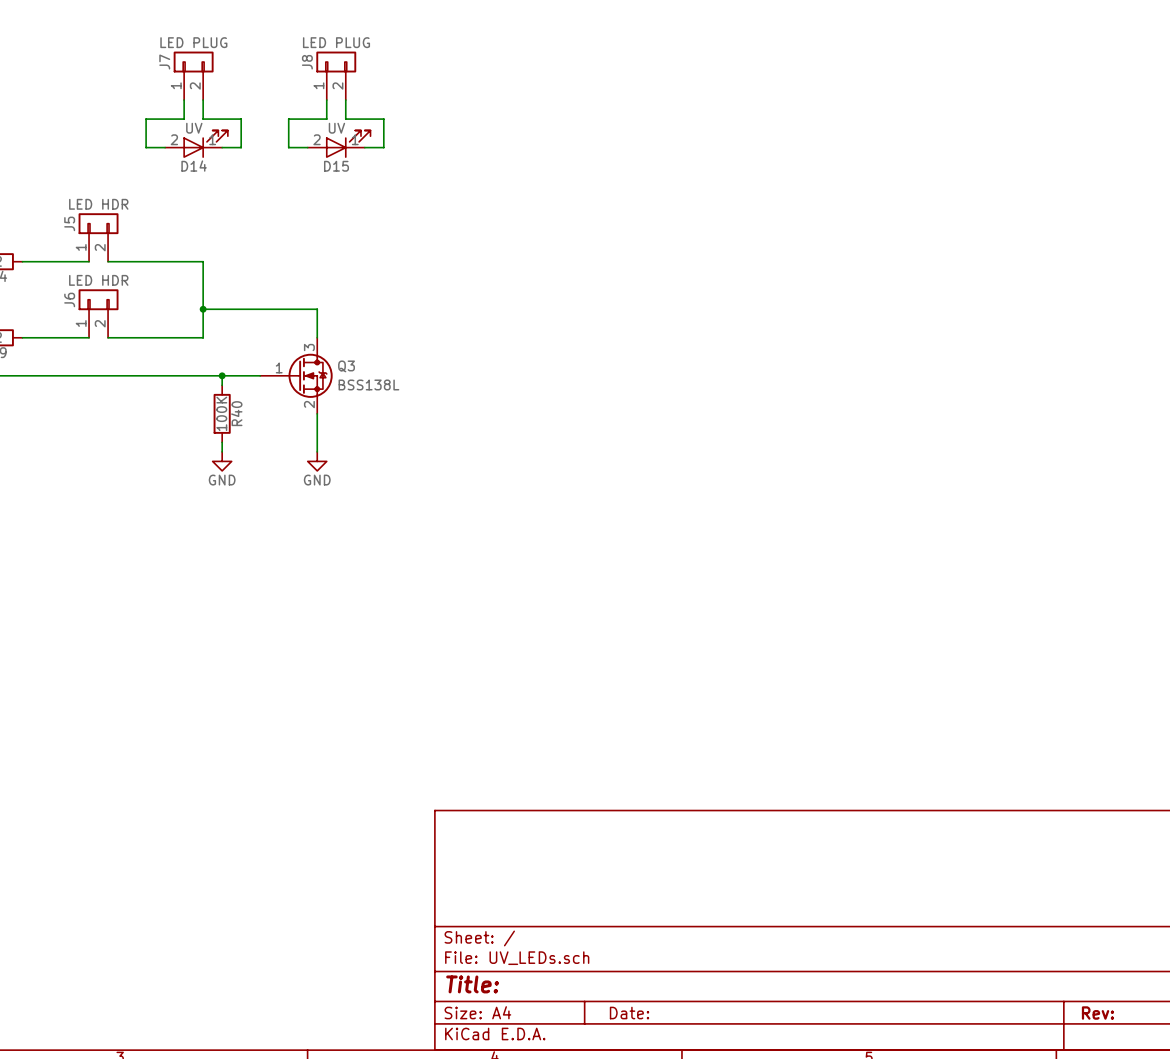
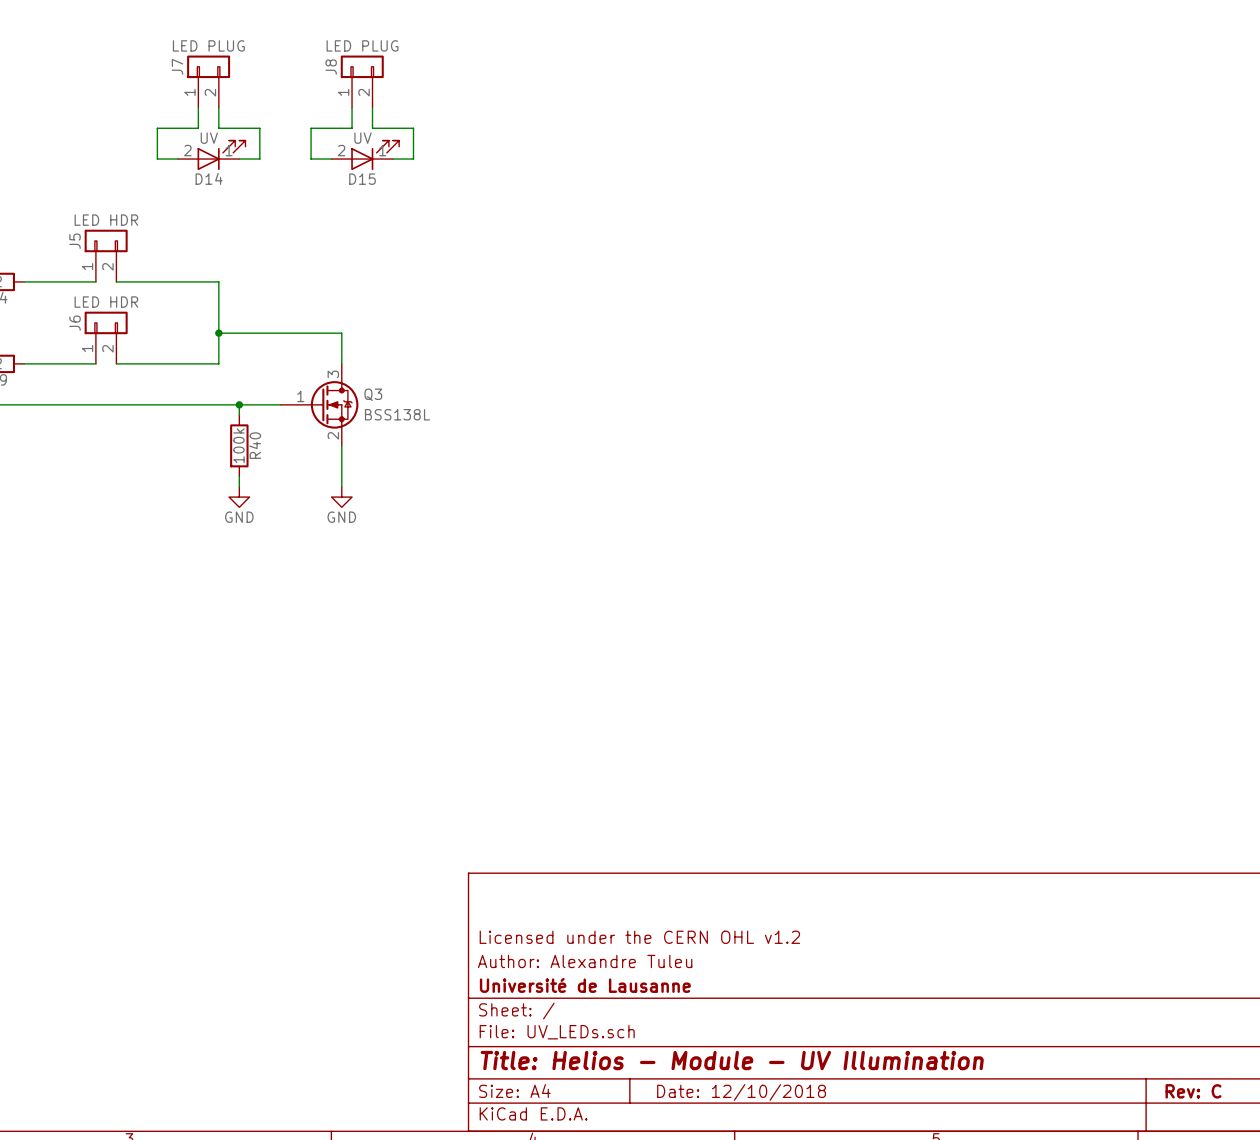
R40 value: 100K (221, 413) -> 100k (238, 445)
title block: none -> Licensed under the CERN OHL v1.2 (639, 937)
title block: none -> Author: Alexandre Tuleu (585, 961)
title block: none -> Université de Lausanne (585, 985)
title block: Title: (472, 984) -> Title: Helios - Module - UV Illumination (732, 1060)
title block: Date: (629, 1013) -> Date: 12/10/2018 (741, 1092)
title block: Rev: (1097, 1013) -> Rev: C (1193, 1091)

